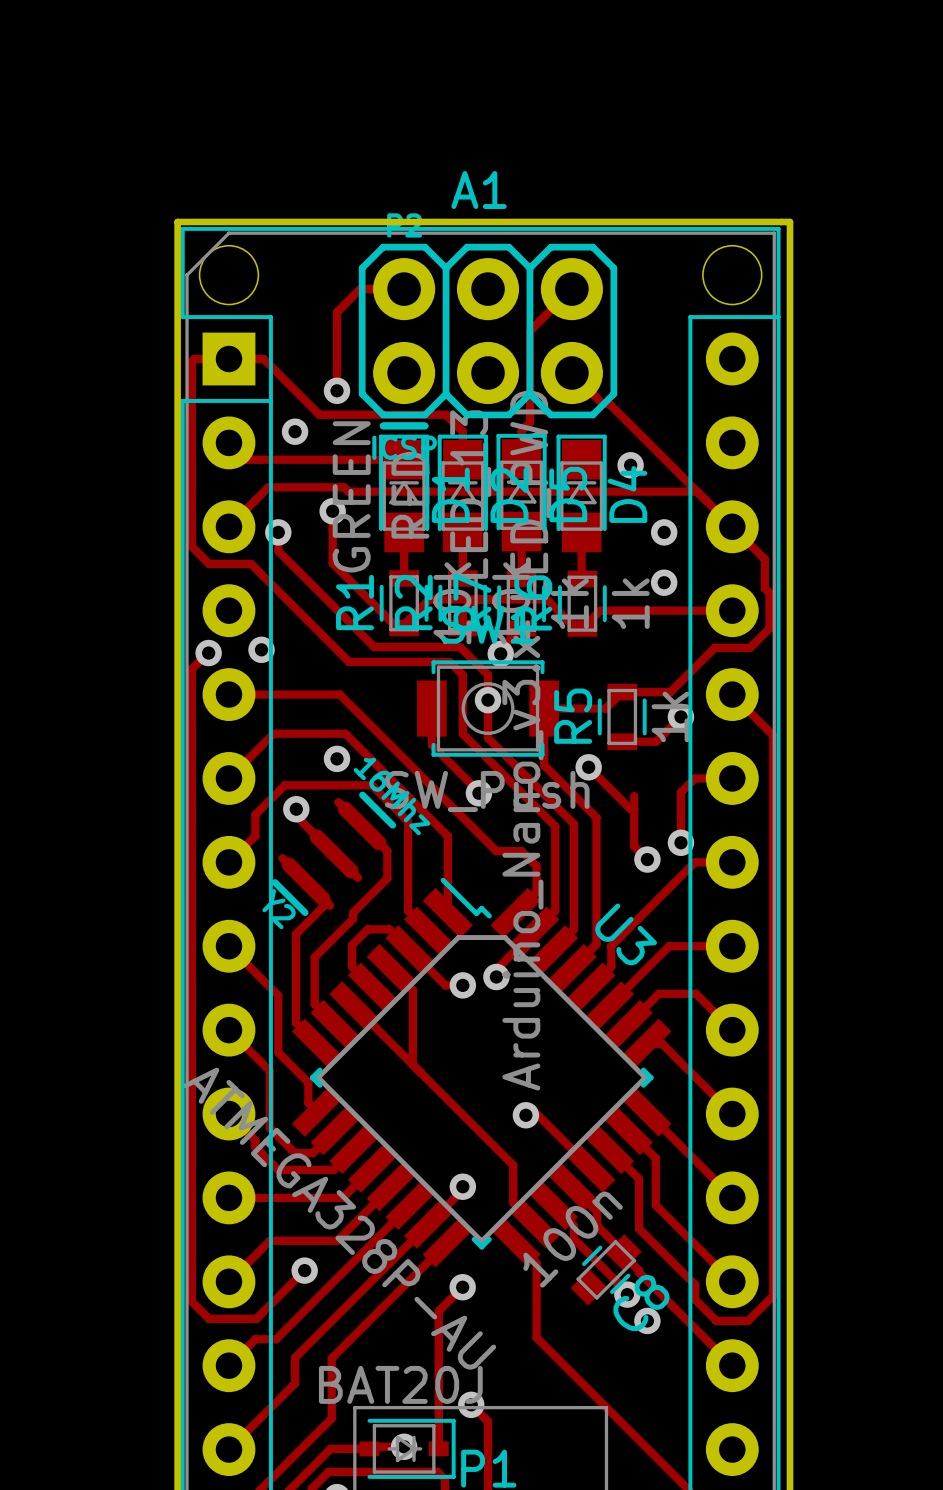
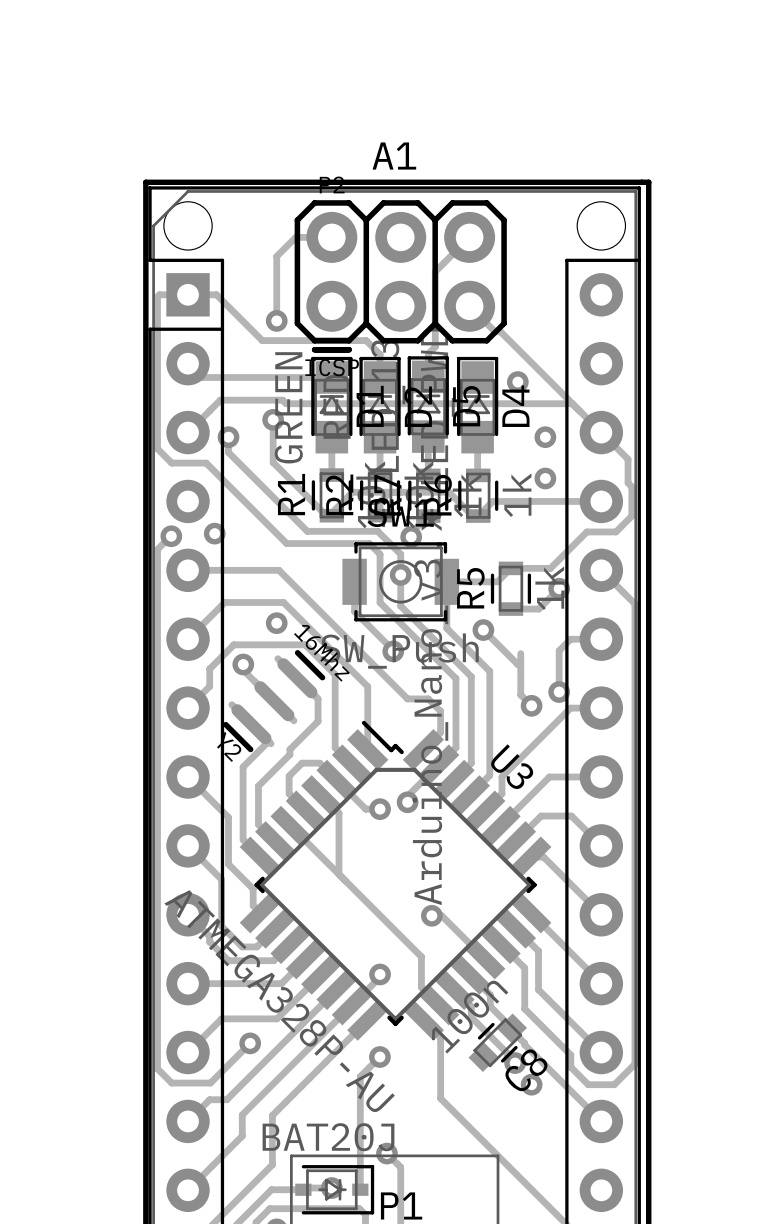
via: (295, 431) -> none

